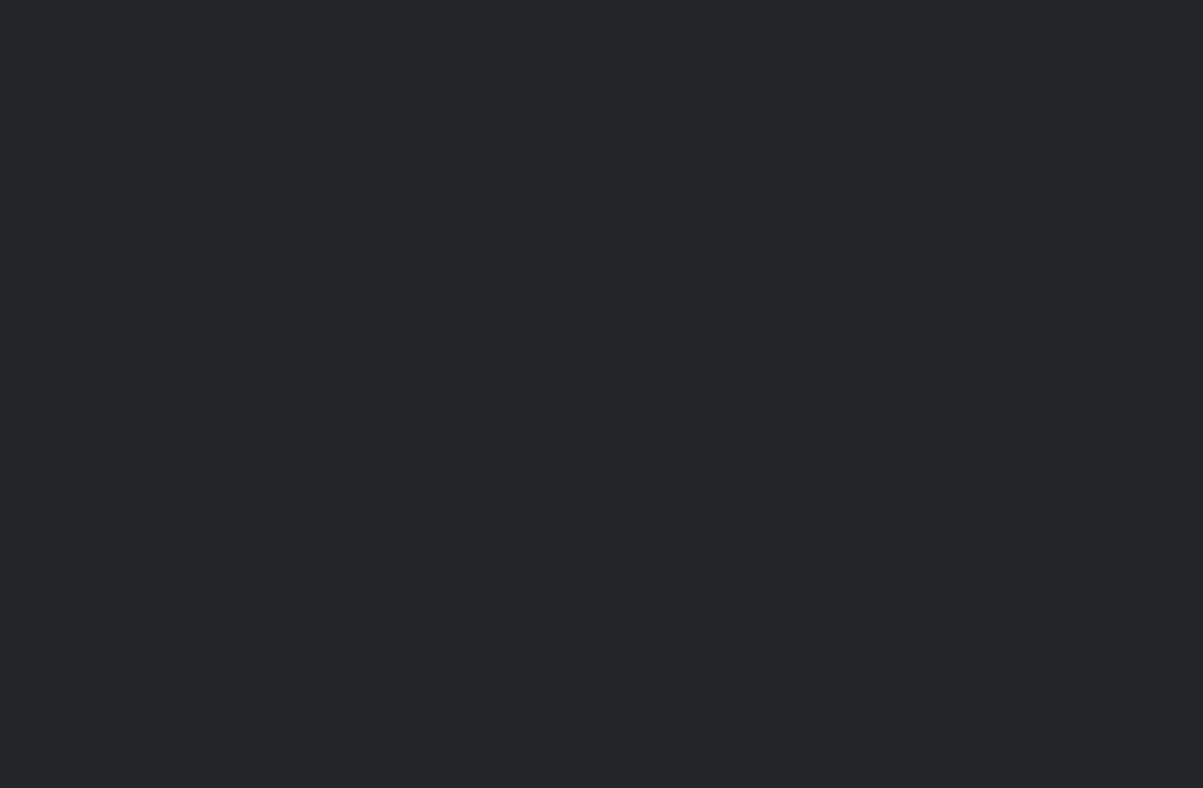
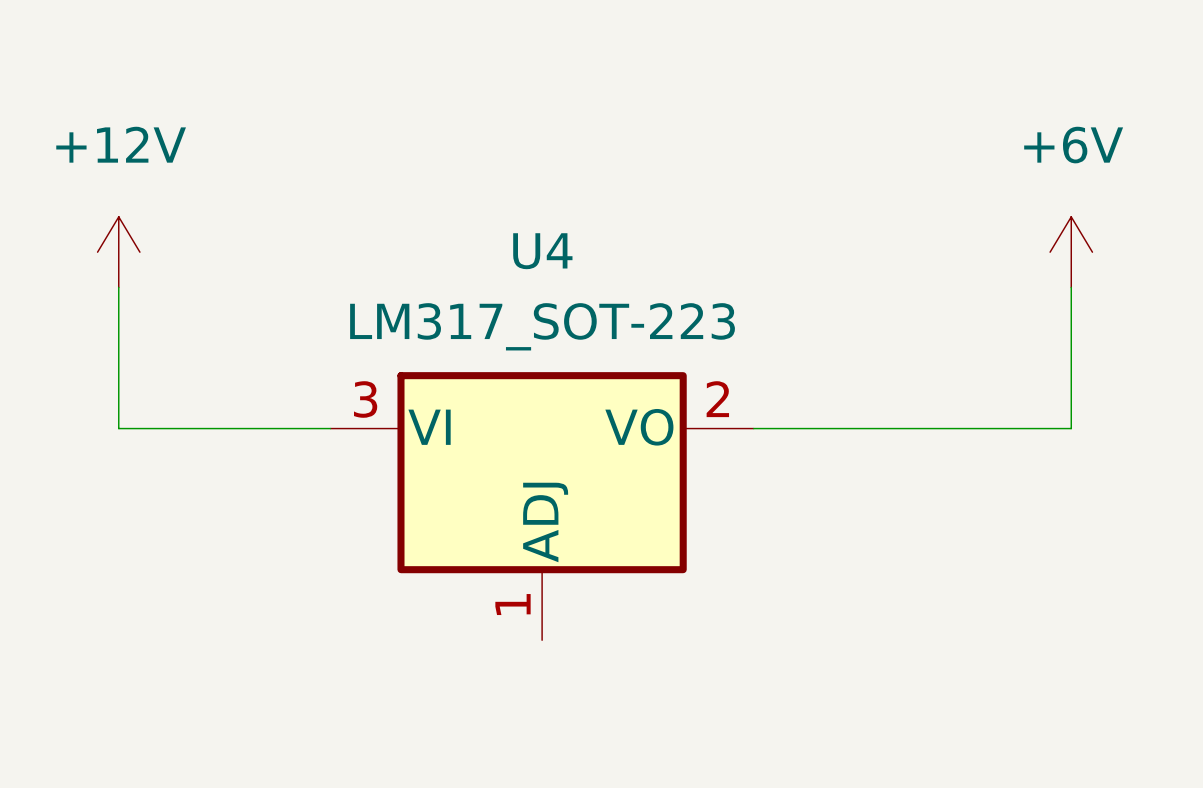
power symbol: none -> +12V (118, 252)
power symbol: none -> +6V (1071, 252)
wire: none -> (118, 287) (118, 428) (330, 428)
wire: none -> (1071, 287) (1071, 428) (753, 428)
U4: none -> LM317_SOT-223 (542, 506)

